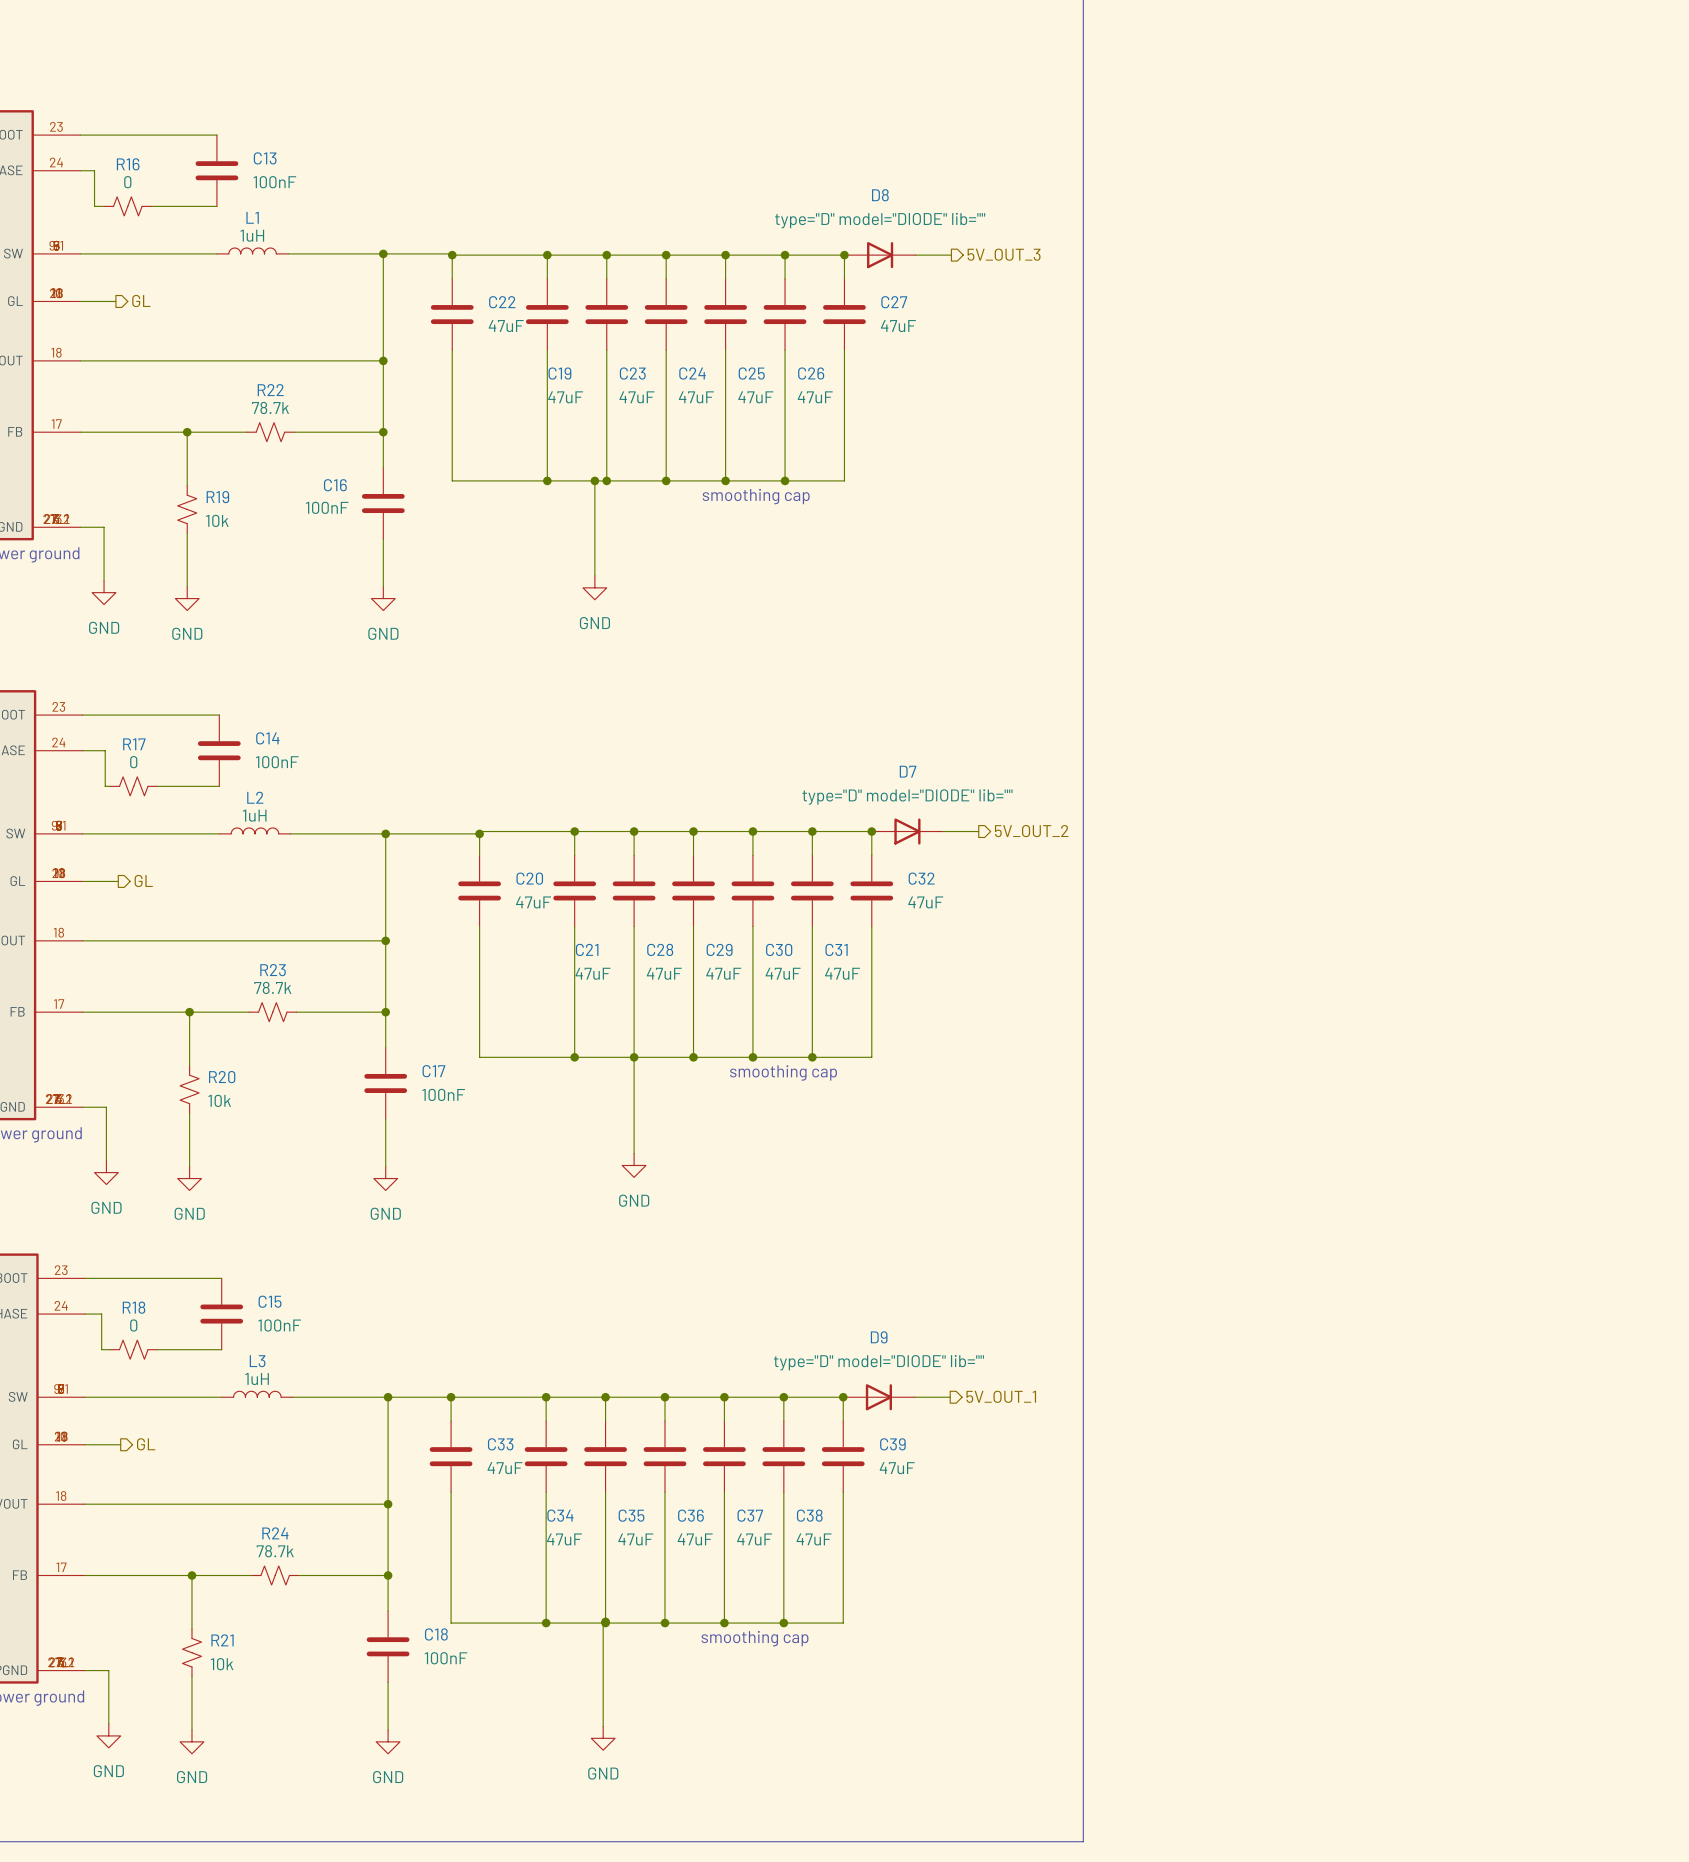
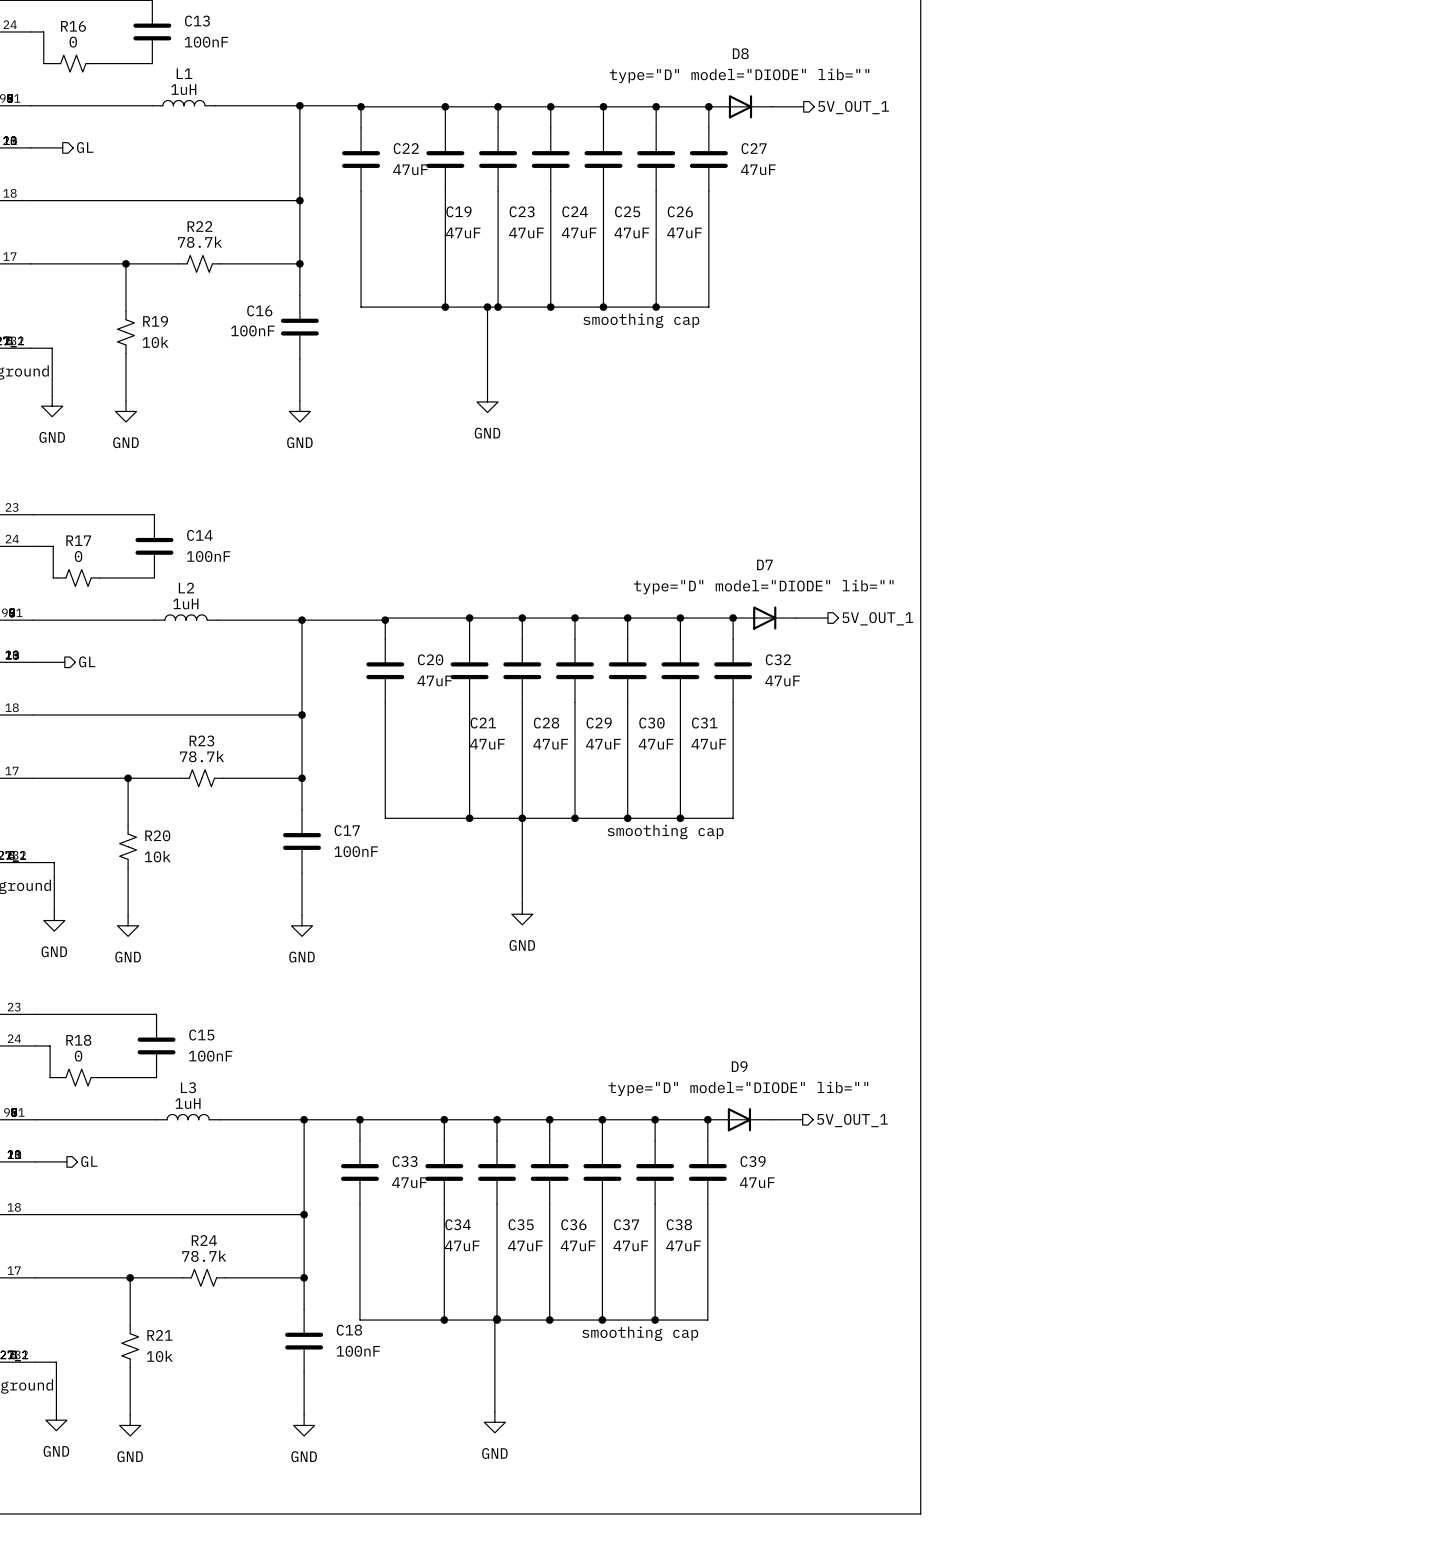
hierarchical label: 5V_OUT_3 (1004, 254) -> 5V_OUT_1 (853, 107)
hierarchical label: 5V_OUT_2 (1031, 831) -> 5V_OUT_1 (877, 618)

